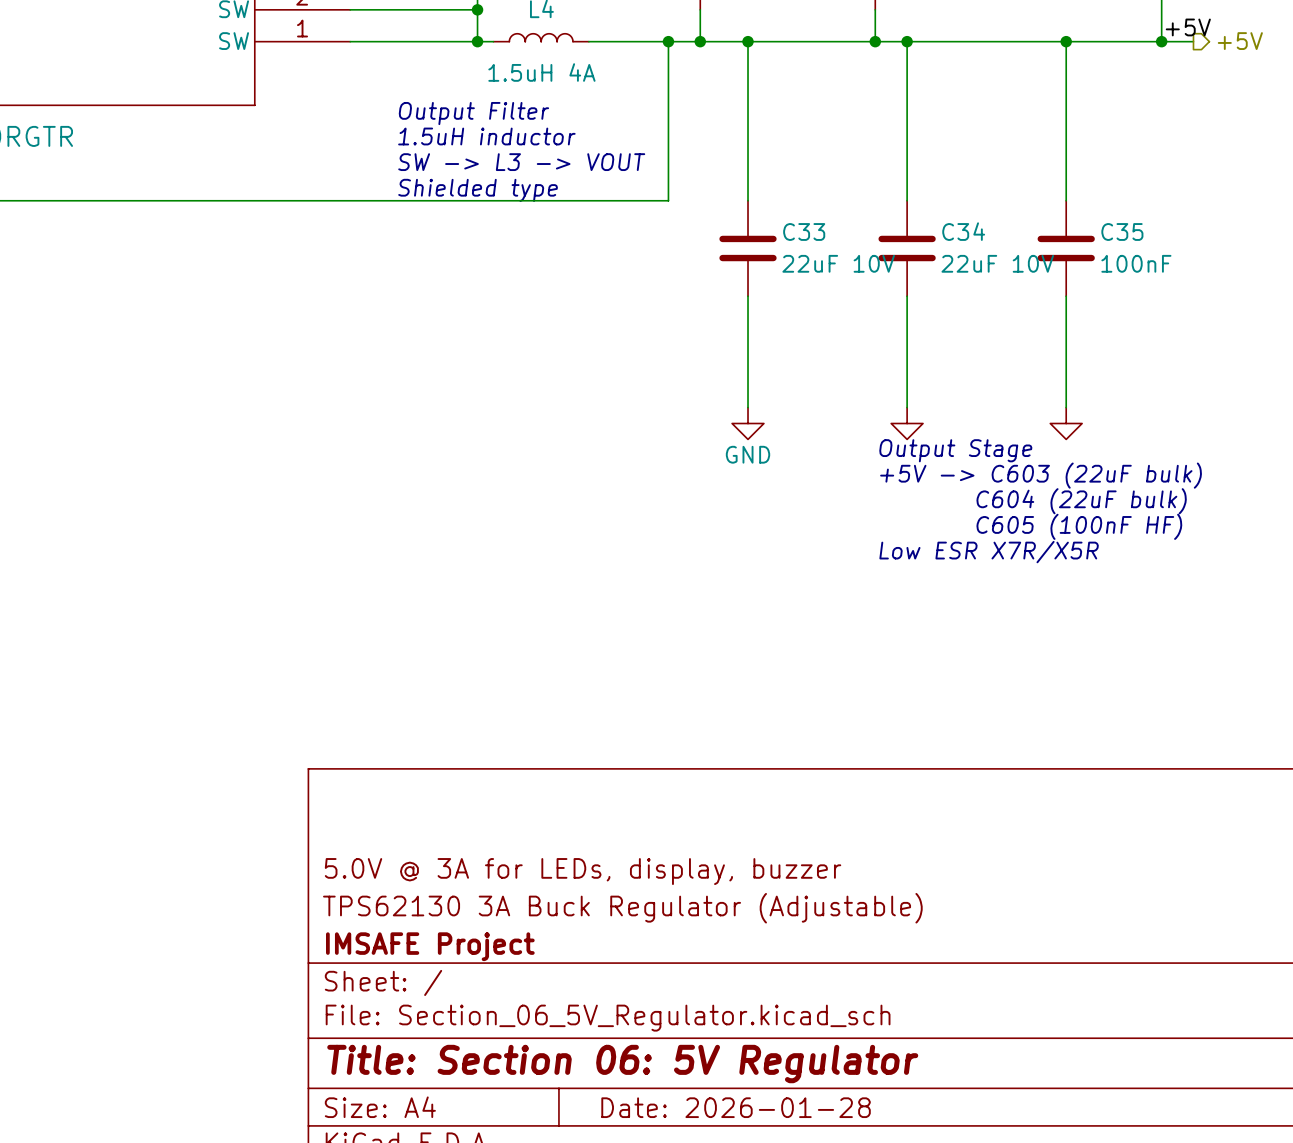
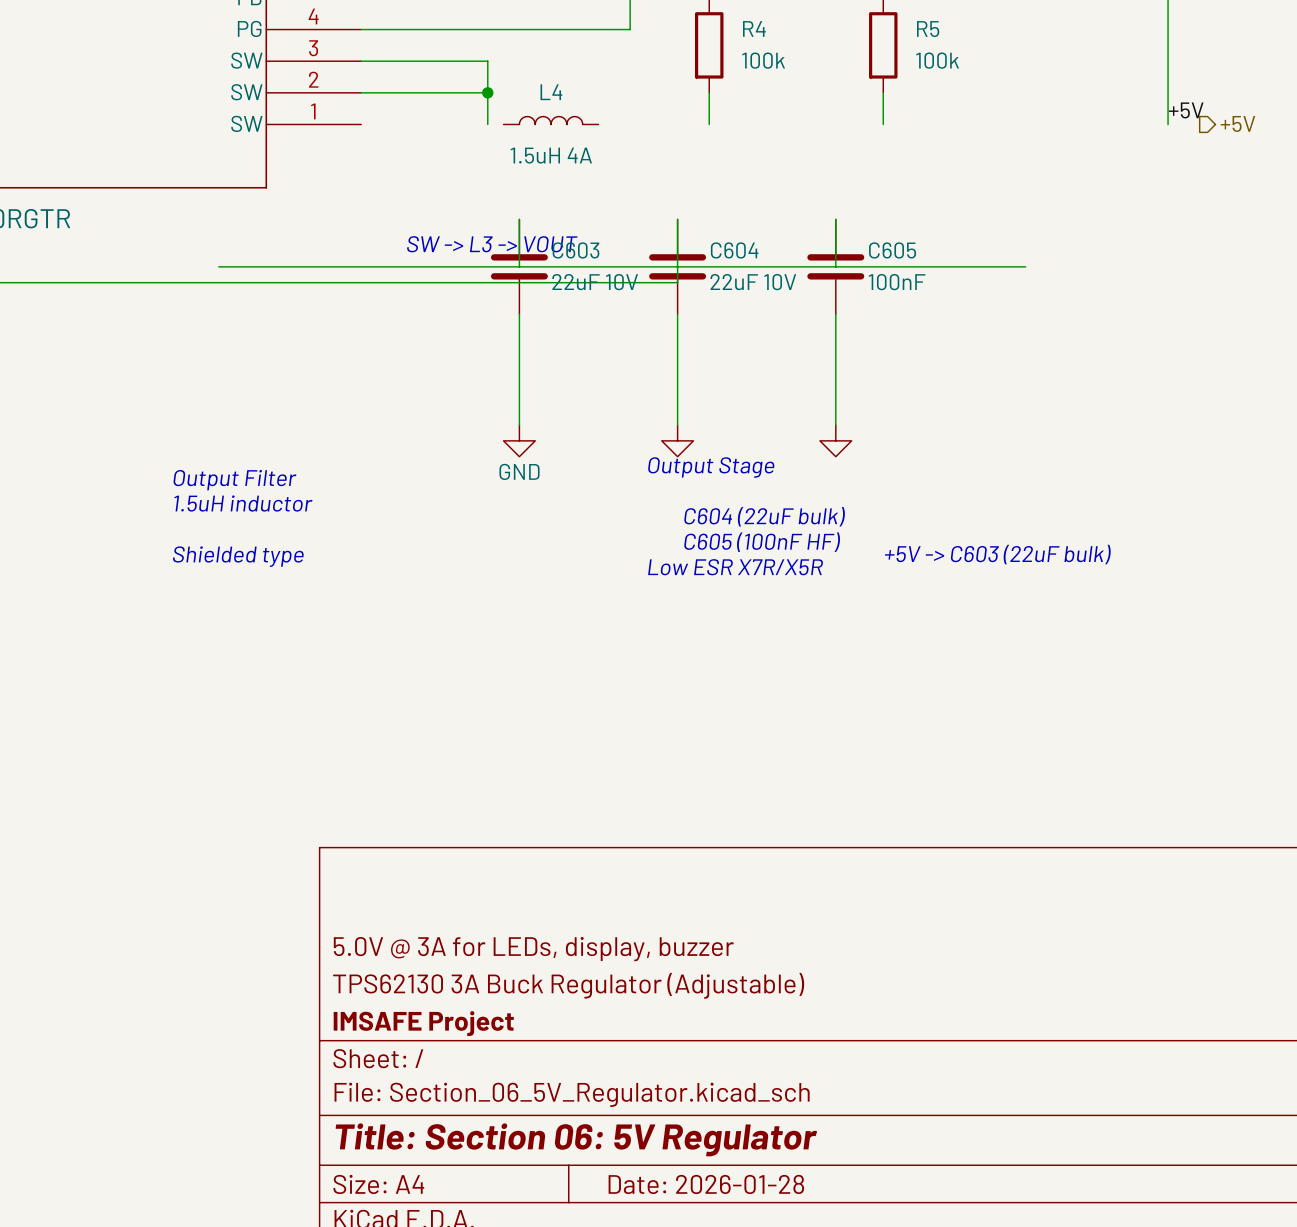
wire: (350, 41) (493, 41) -> none
junction: (477, 41) -> none
wire: (588, 41) (1193, 41) -> none
wire: (668, 41) (668, 137) -> none
junction: (668, 41) -> none
junction: (700, 41) -> none
wire: (748, 41) (748, 200) -> none
junction: (748, 41) -> none
junction: (875, 41) -> none
wire: (907, 41) (907, 200) -> none
junction: (907, 41) -> none
wire: (1066, 41) (1066, 200) -> none
junction: (1066, 41) -> none
junction: (1161, 41) -> none
text: Output Filter (473, 113) -> none
text: 1.5uH inductor (486, 136) -> none
wire: none -> (519, 219) (519, 266)
wire: none -> (835, 219) (835, 266)
wire: none -> (218, 266) (1025, 266)
C603: none -> 22uF 10V (519, 266)
C604: none -> 22uF 10V (677, 266)
C605: none -> 100nF (835, 266)
text: Shielded type (478, 190) -> none
C33: 22uF 10V (748, 248) -> none
C34: 22uF 10V (907, 248) -> none
C35: 100nF (1066, 248) -> none
wire: (748, 296) (748, 407) -> (519, 314) (519, 425)
wire: (907, 296) (907, 407) -> (677, 314) (677, 425)
wire: (1066, 296) (1066, 407) -> (835, 314) (835, 425)
power symbol: none -> (677, 440)
text: none -> Output Filter (234, 480)
text: none -> 1.5uH inductor (243, 503)
power symbol position: GND (748, 423) -> GND (519, 440)
power symbol position: (907, 423) -> (835, 440)
power symbol: (1066, 423) -> none
text position: Output Stage (955, 450) -> Output Stage (711, 467)
text: none -> Shielded type (238, 556)
text position: C604 (22uF bulk) (1081, 501) -> C604 (22uF bulk) (764, 516)
text position: C605 (100nF HF) (1079, 526) -> C605 (100nF HF) (762, 542)
text position: Low ESR X7R/X5R (989, 552) -> Low ESR X7R/X5R (735, 567)

